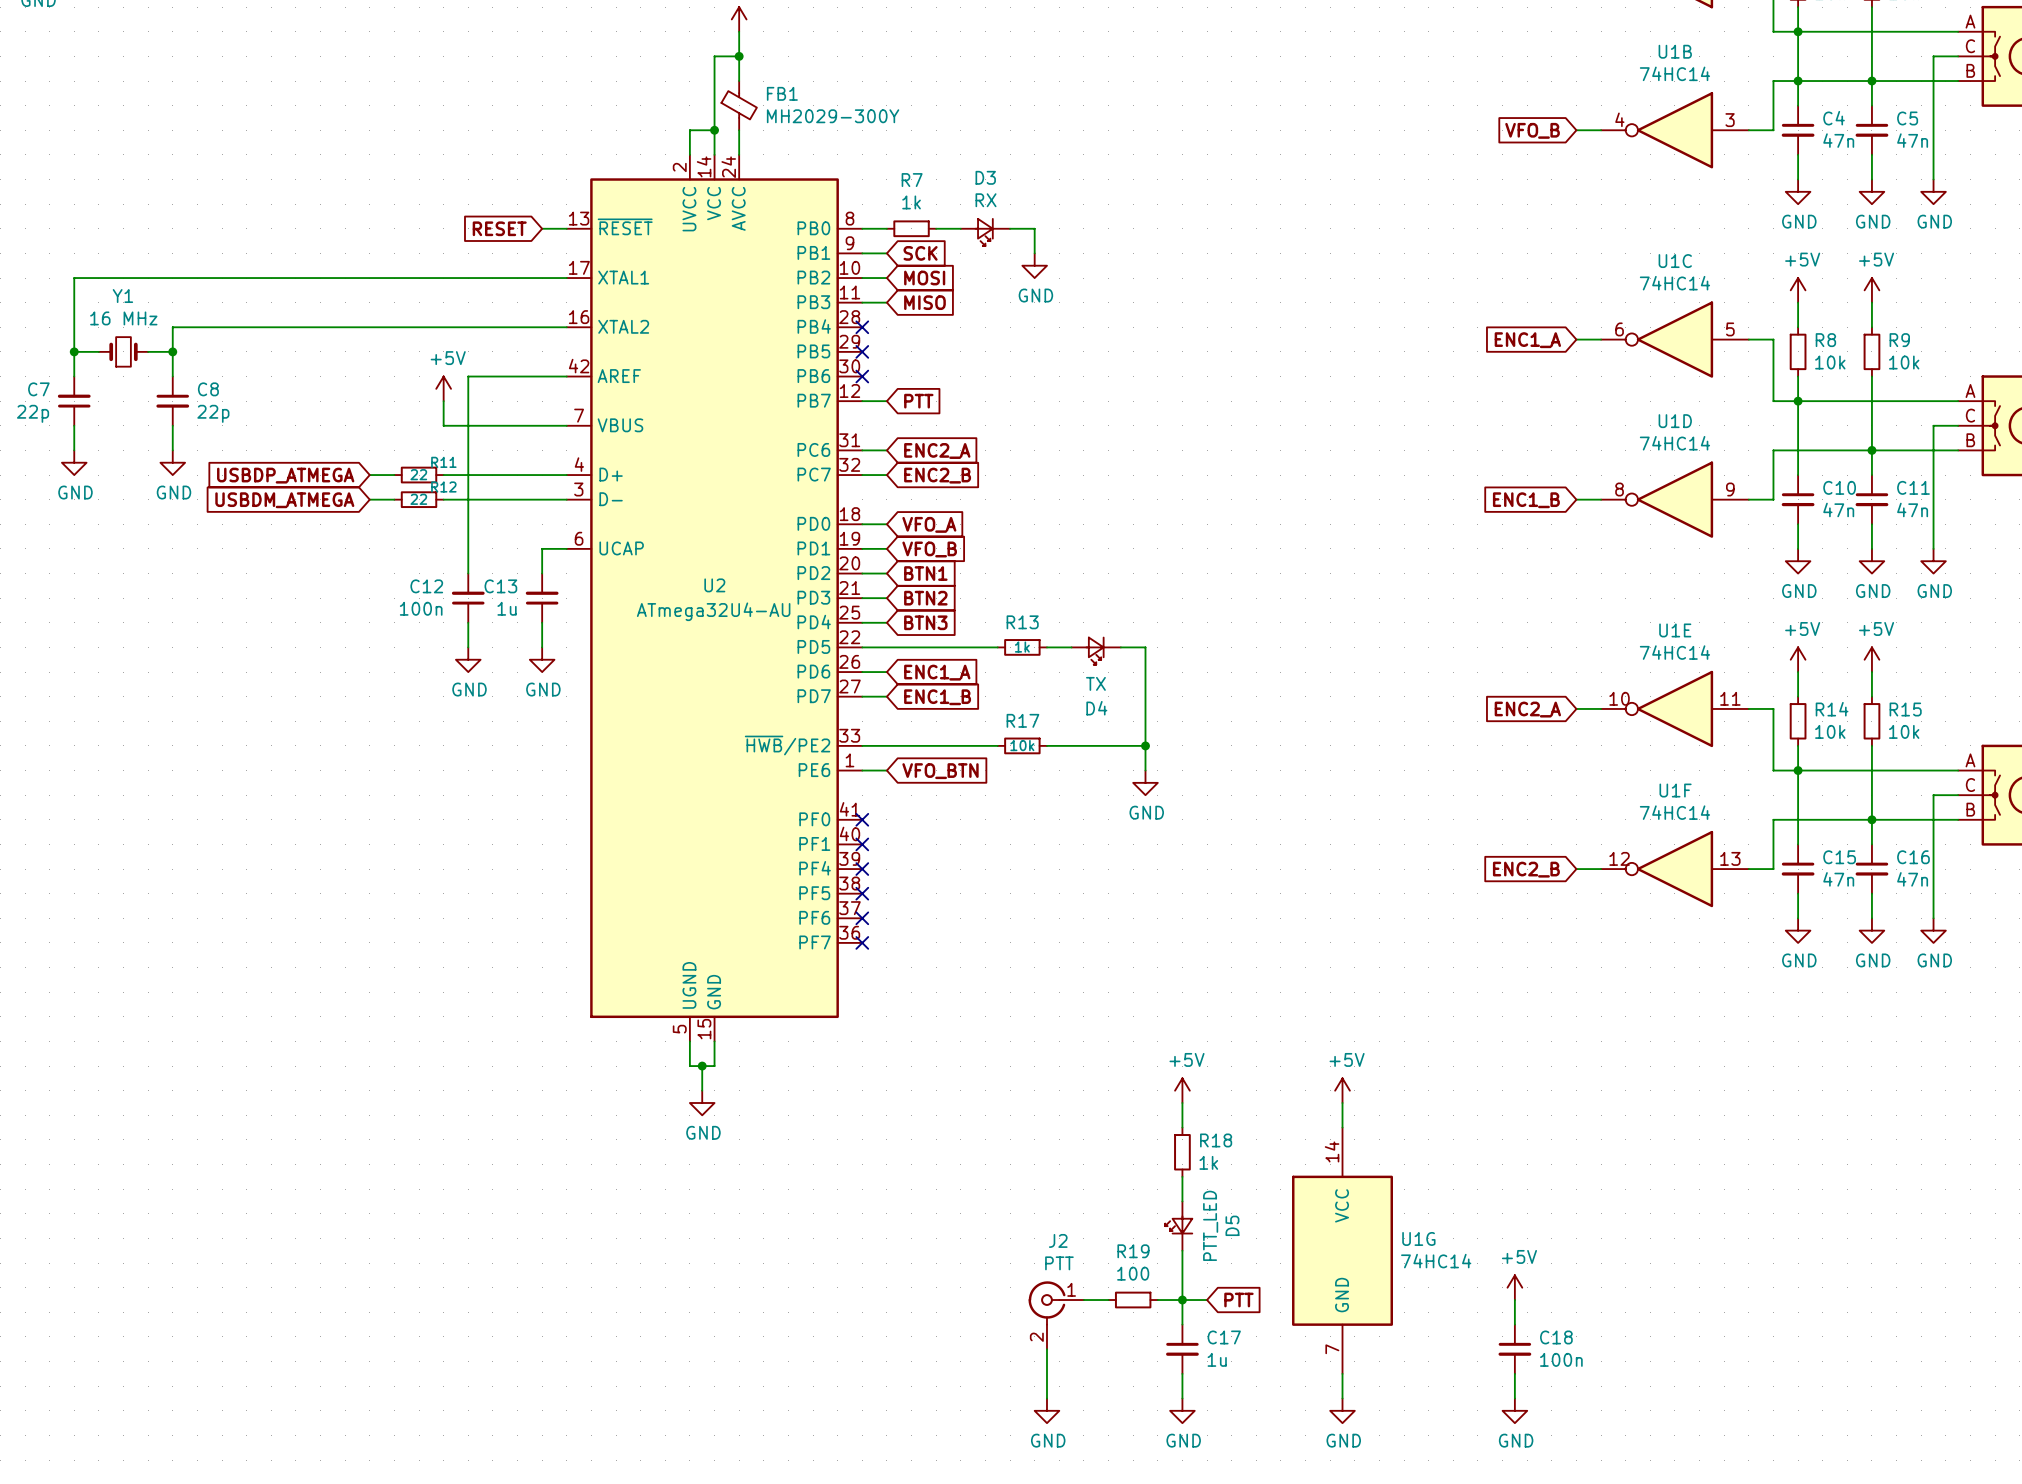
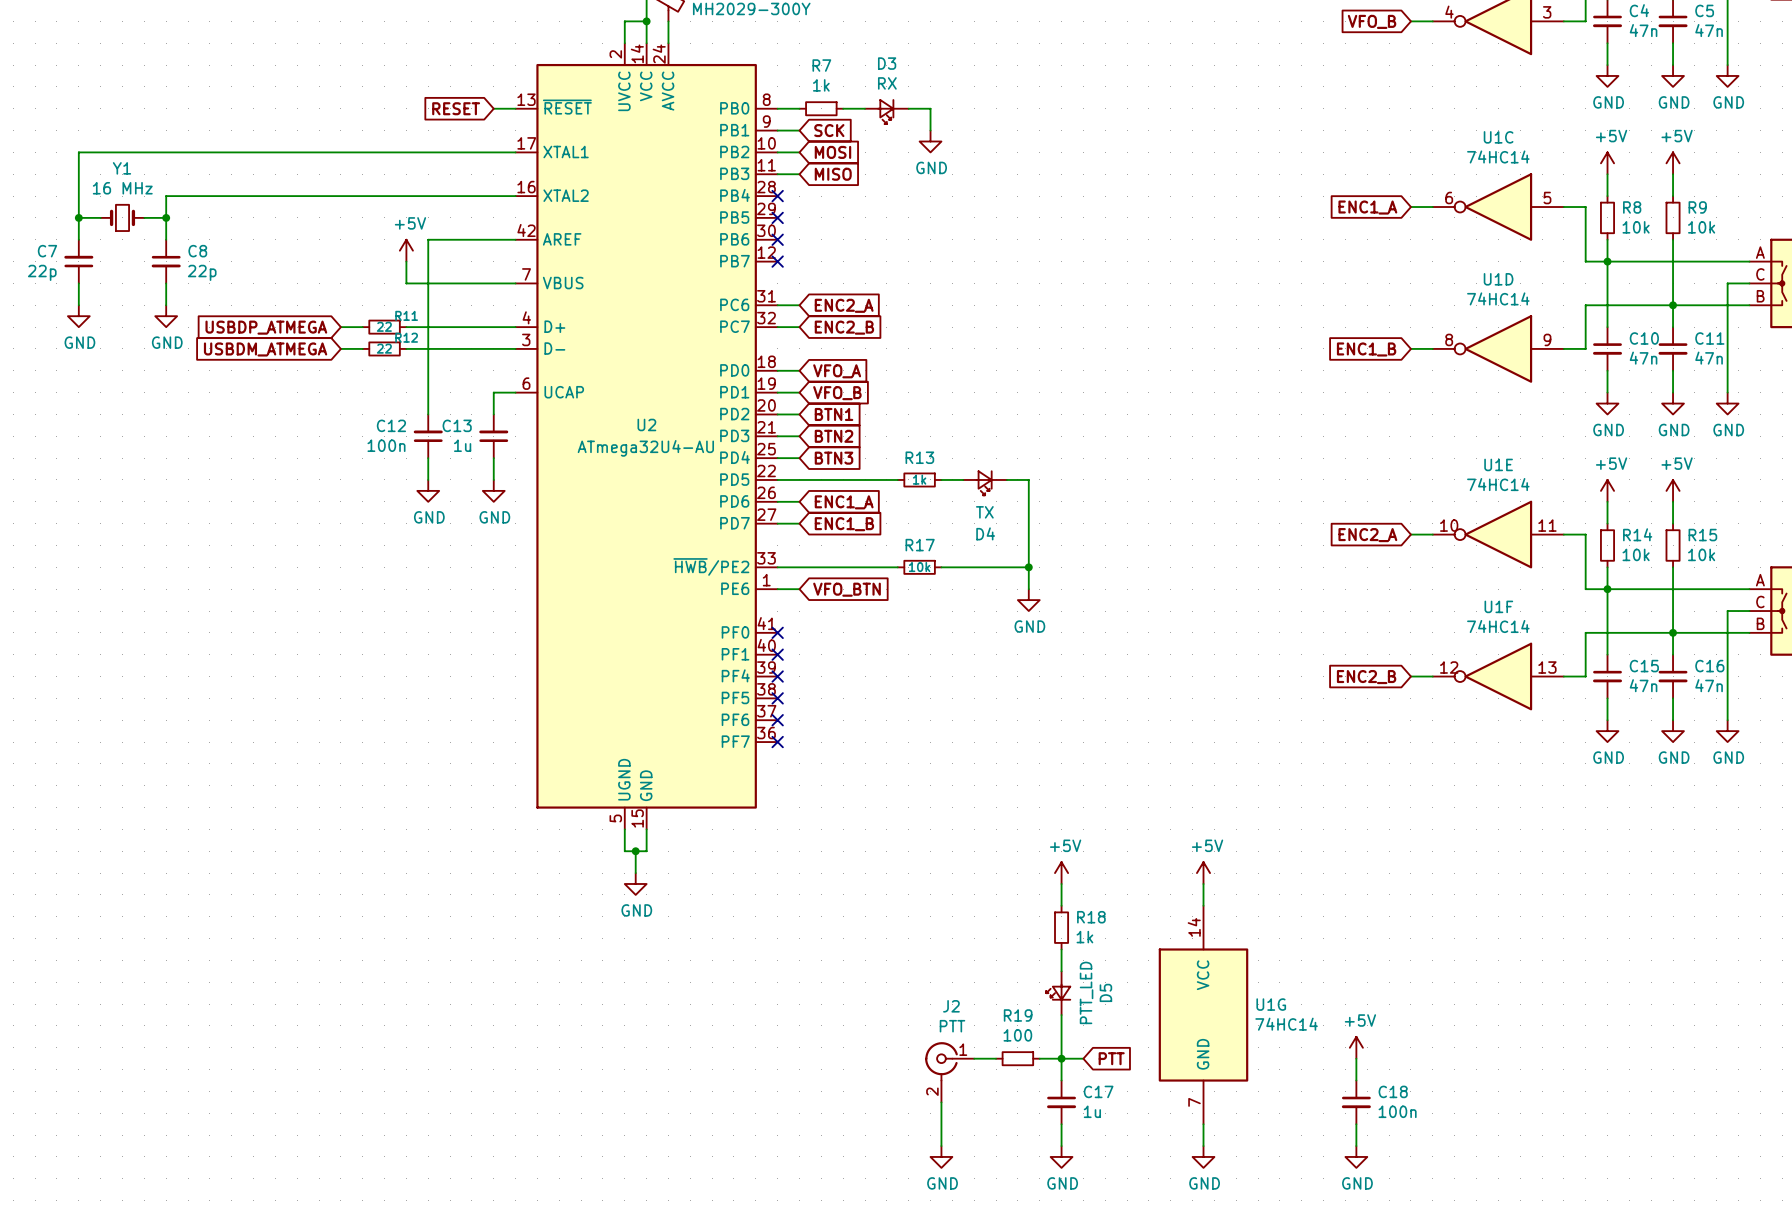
wire: (862, 401) (886, 401) -> none
no-connect mark: none -> (777, 261)
global label: PTT (918, 401) -> none

